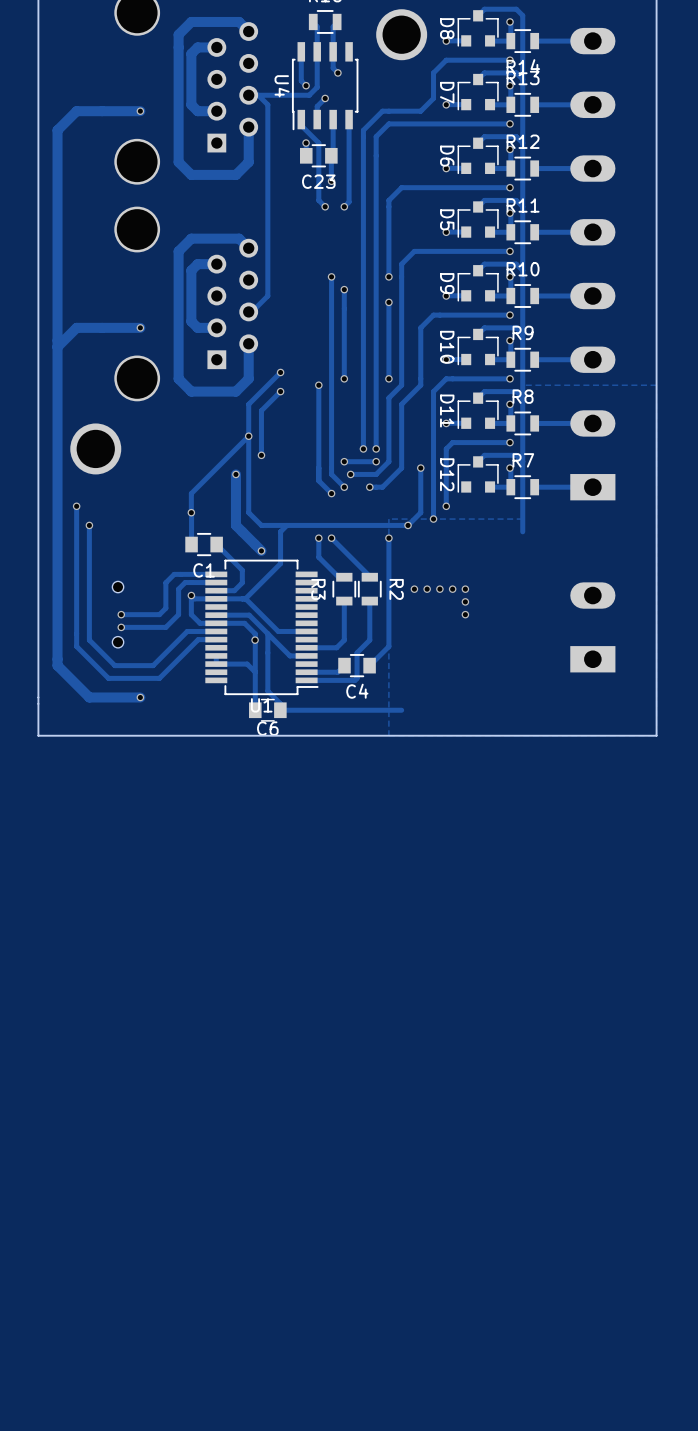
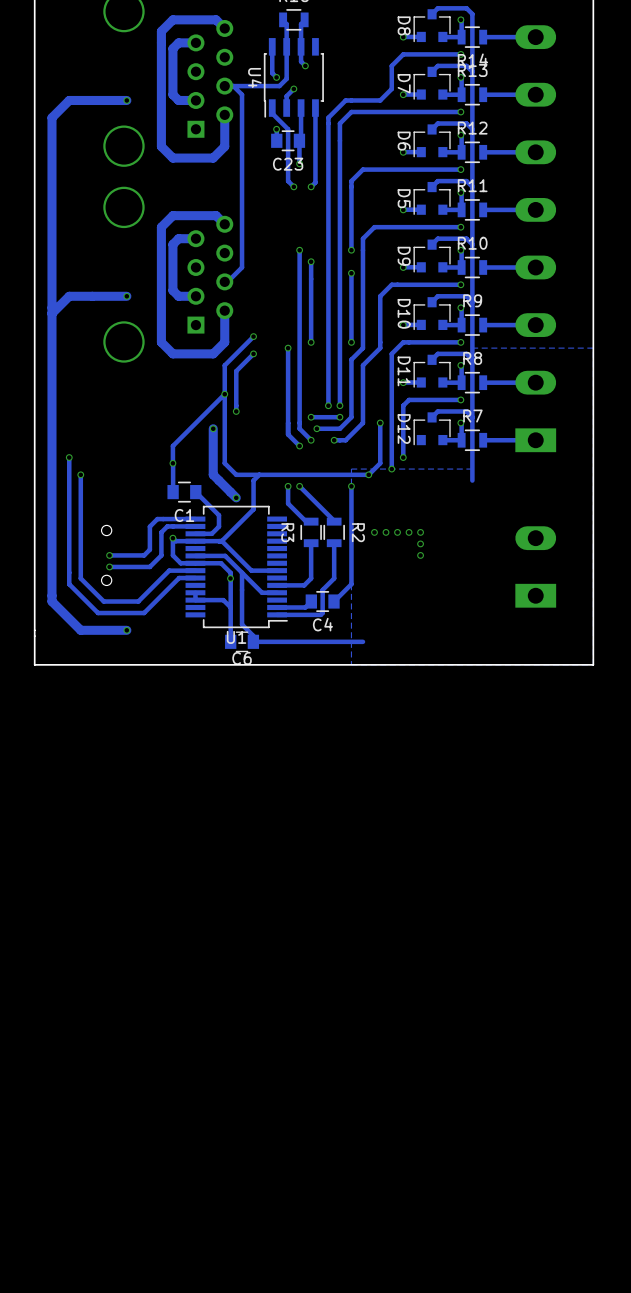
part: (401, 34) -> none
part: (95, 448) -> none

